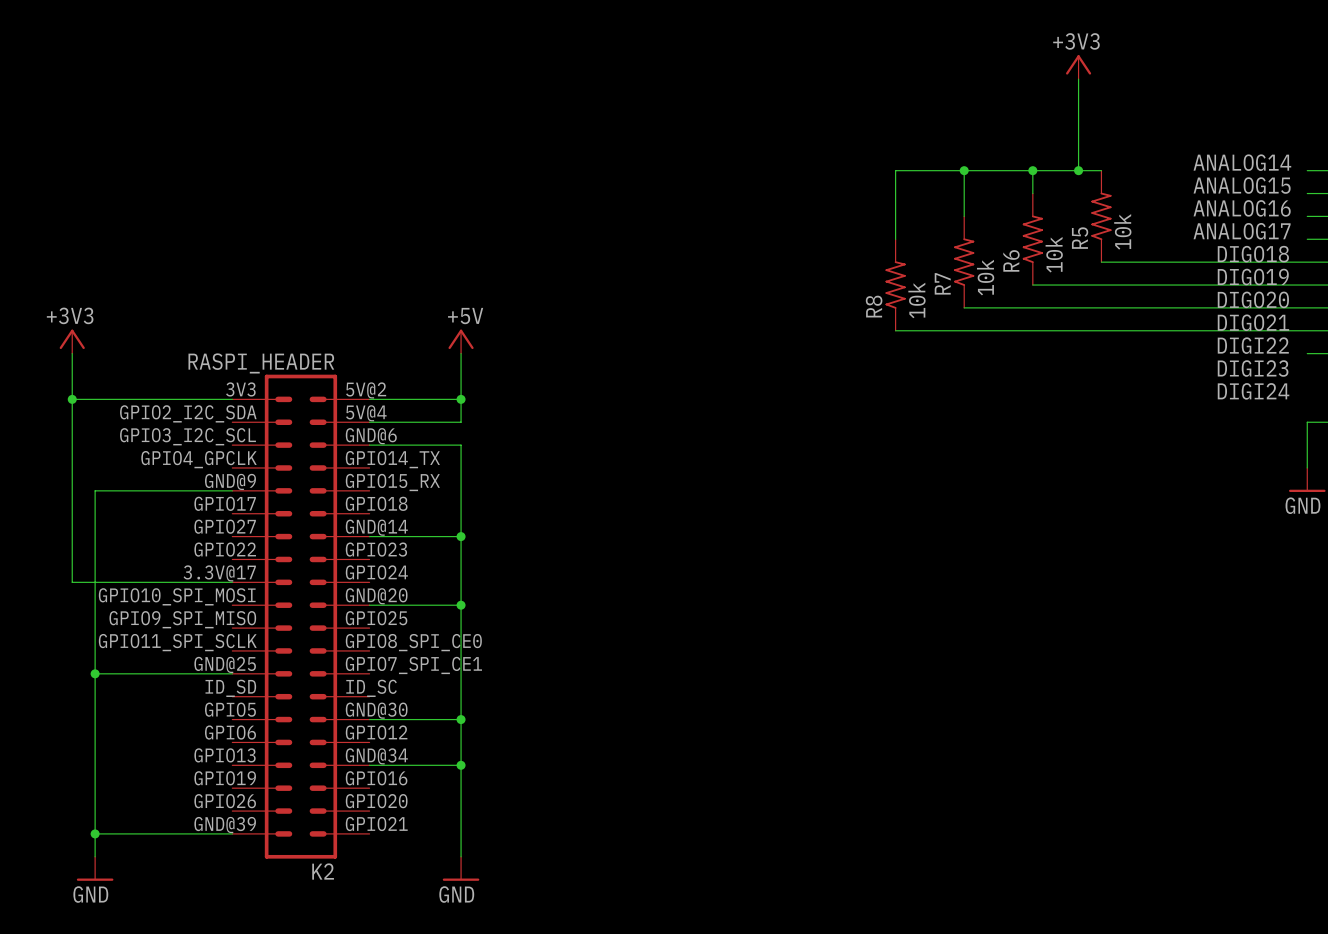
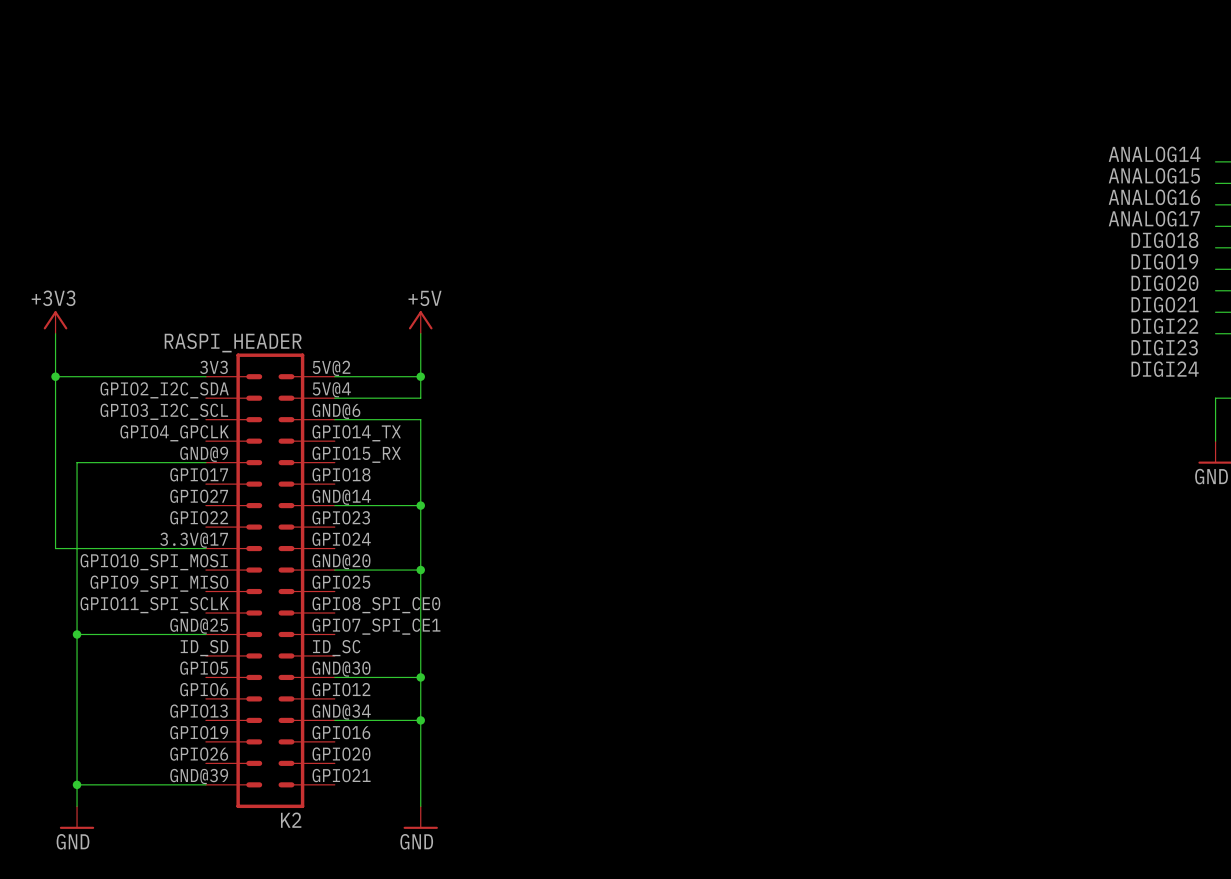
power symbol: +3V3 (1078, 67) -> none
wire: (1078, 79) (1078, 170) -> none
wire: (964, 170) (964, 216) -> none
junction: (964, 170) -> none
wire: (1032, 170) (1032, 193) -> none
junction: (1032, 170) -> none
junction: (1078, 170) -> none
wire: (1101, 170) (895, 170) (895, 239) -> none
R5: 10k (1101, 216) -> none
R6: 10k (1032, 239) -> none
R7: 10k (964, 262) -> none
wire: (1101, 262) (1307, 262) -> none
R8: 10k (895, 285) -> none
wire: (1032, 285) (1307, 285) -> none
wire: (964, 307) (1307, 307) -> none
wire: (895, 330) (1307, 330) -> none

